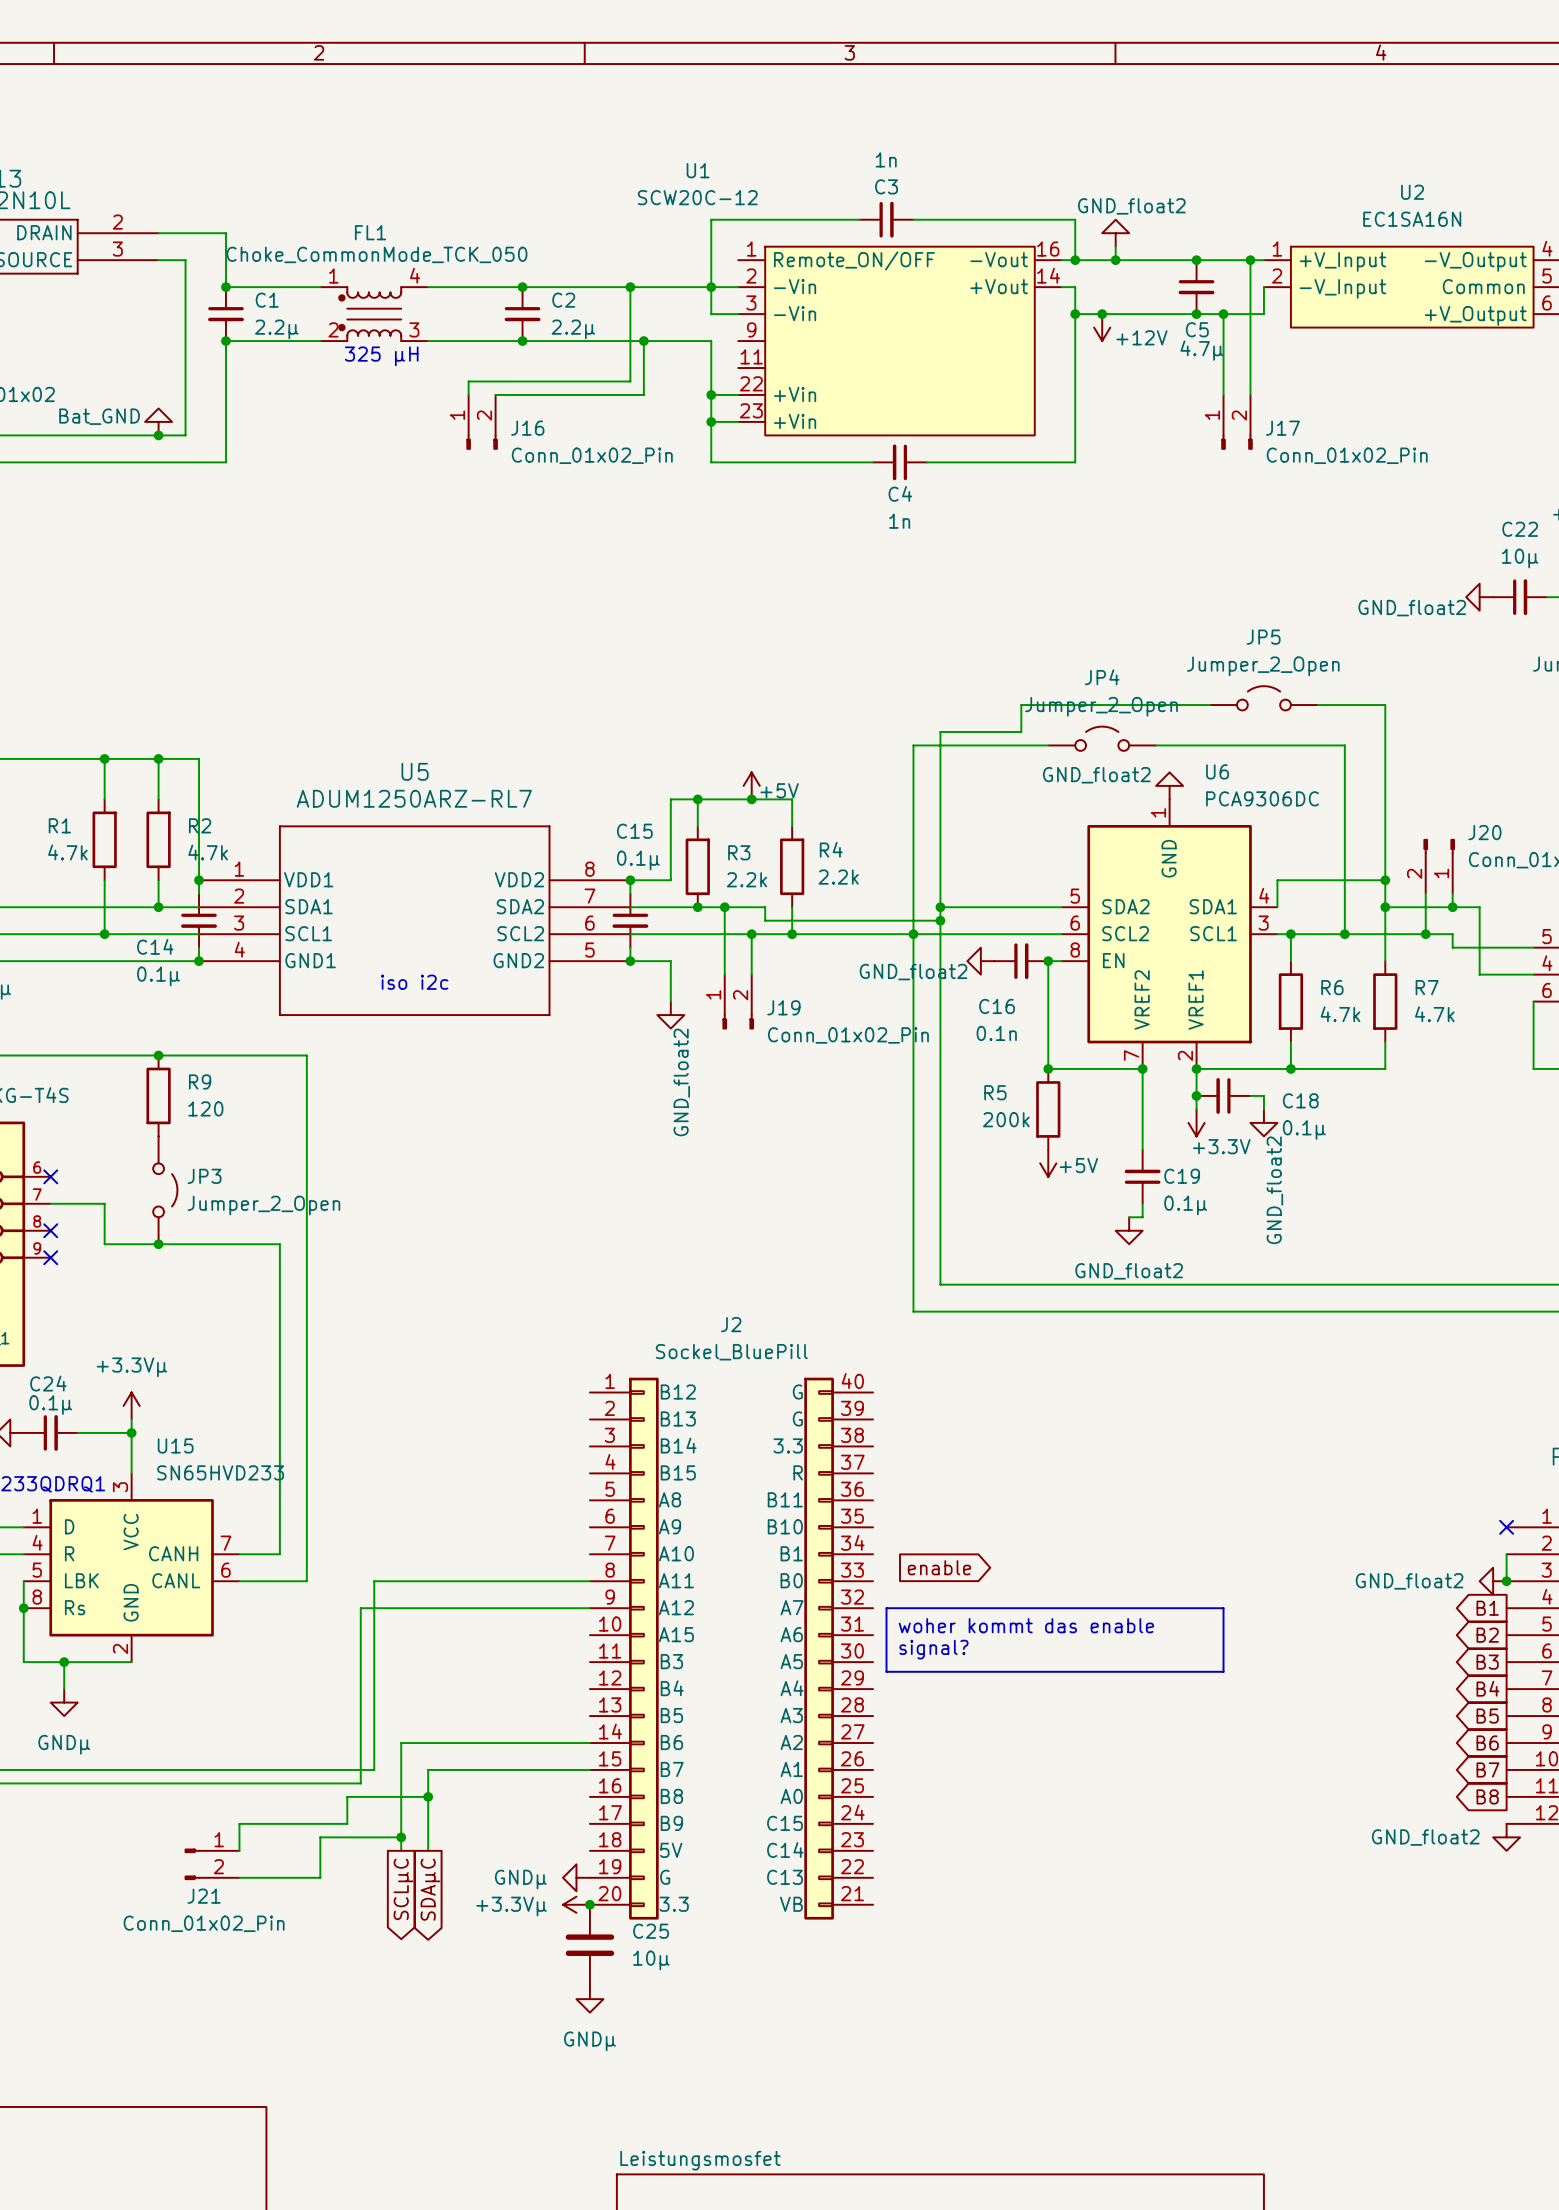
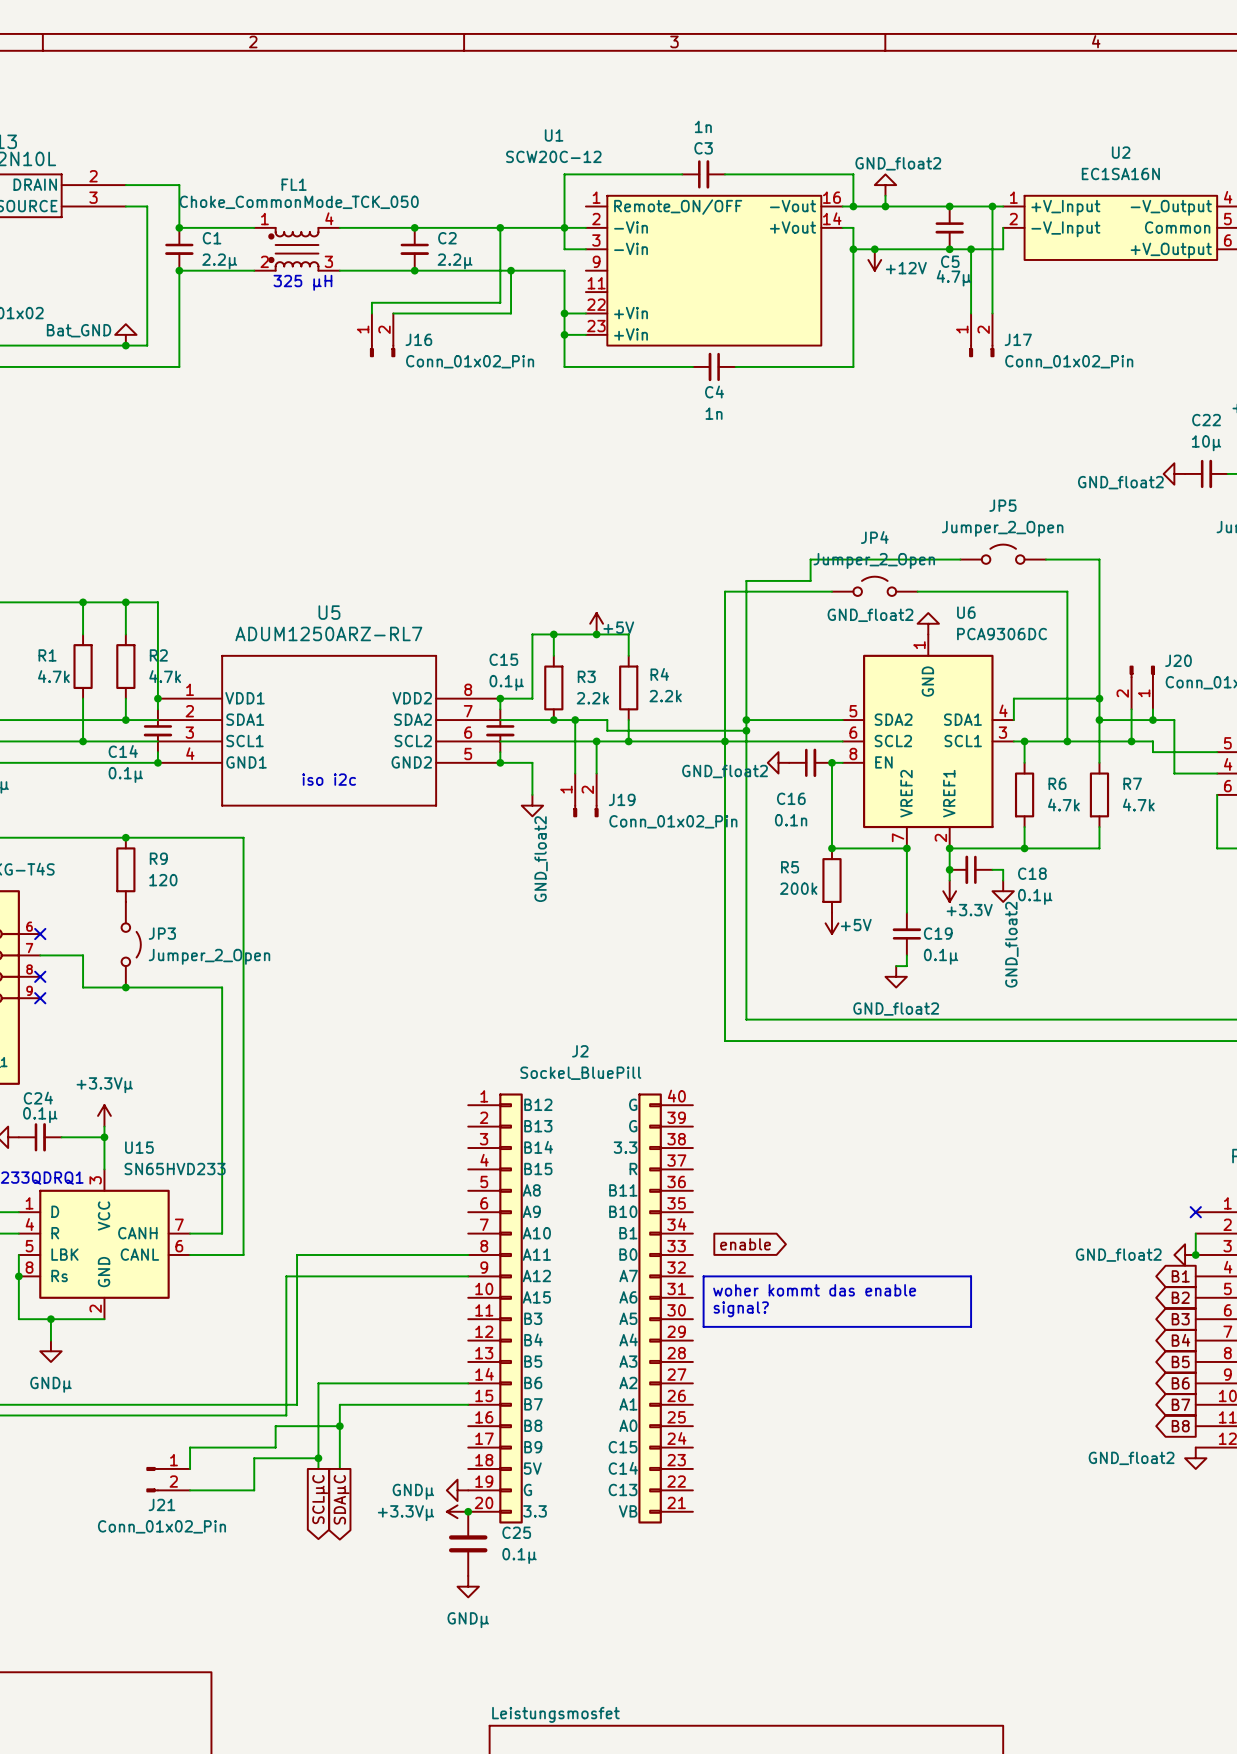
C25 value: 10µ (651, 1960) -> 0.1µ (519, 1555)

